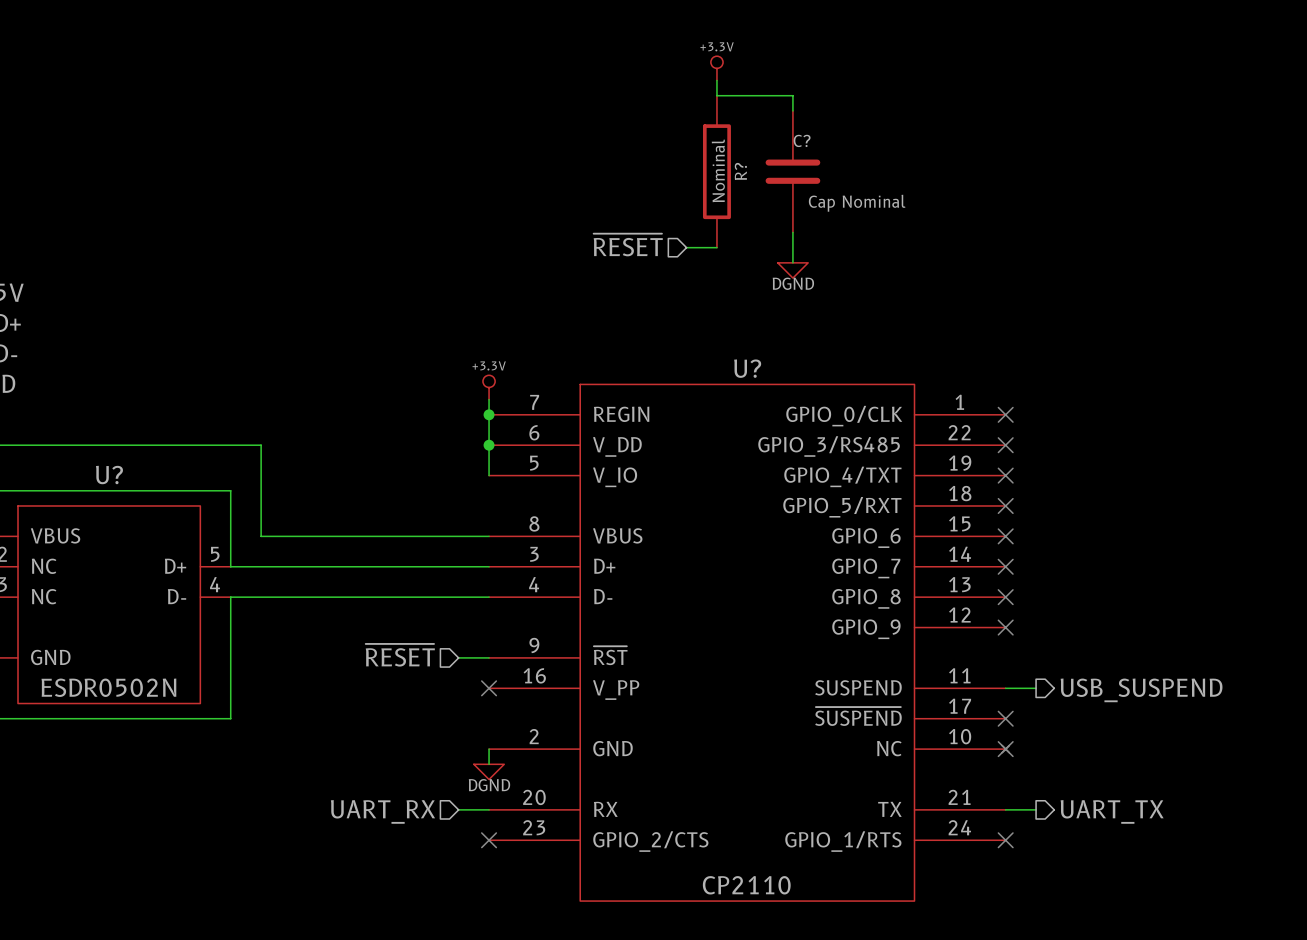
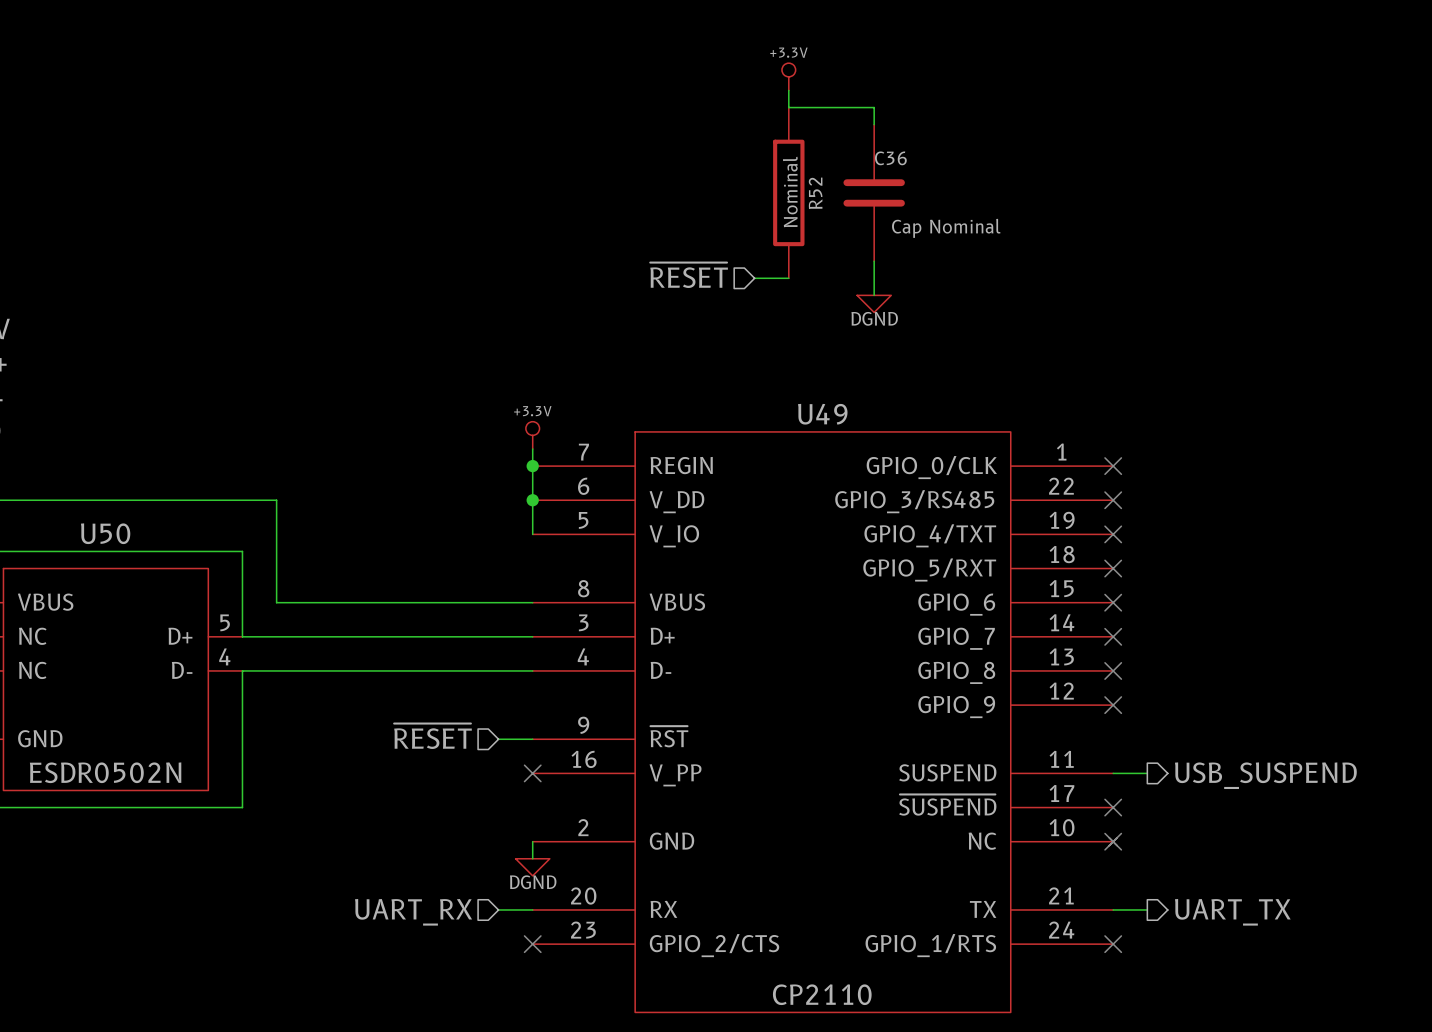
C? name: C? (802, 140) -> C36 (890, 158)
R? name: R? (740, 171) -> R52 (815, 193)
U? name: U? (747, 368) -> U49 (822, 414)
U? name: U? (109, 475) -> U50 (105, 533)

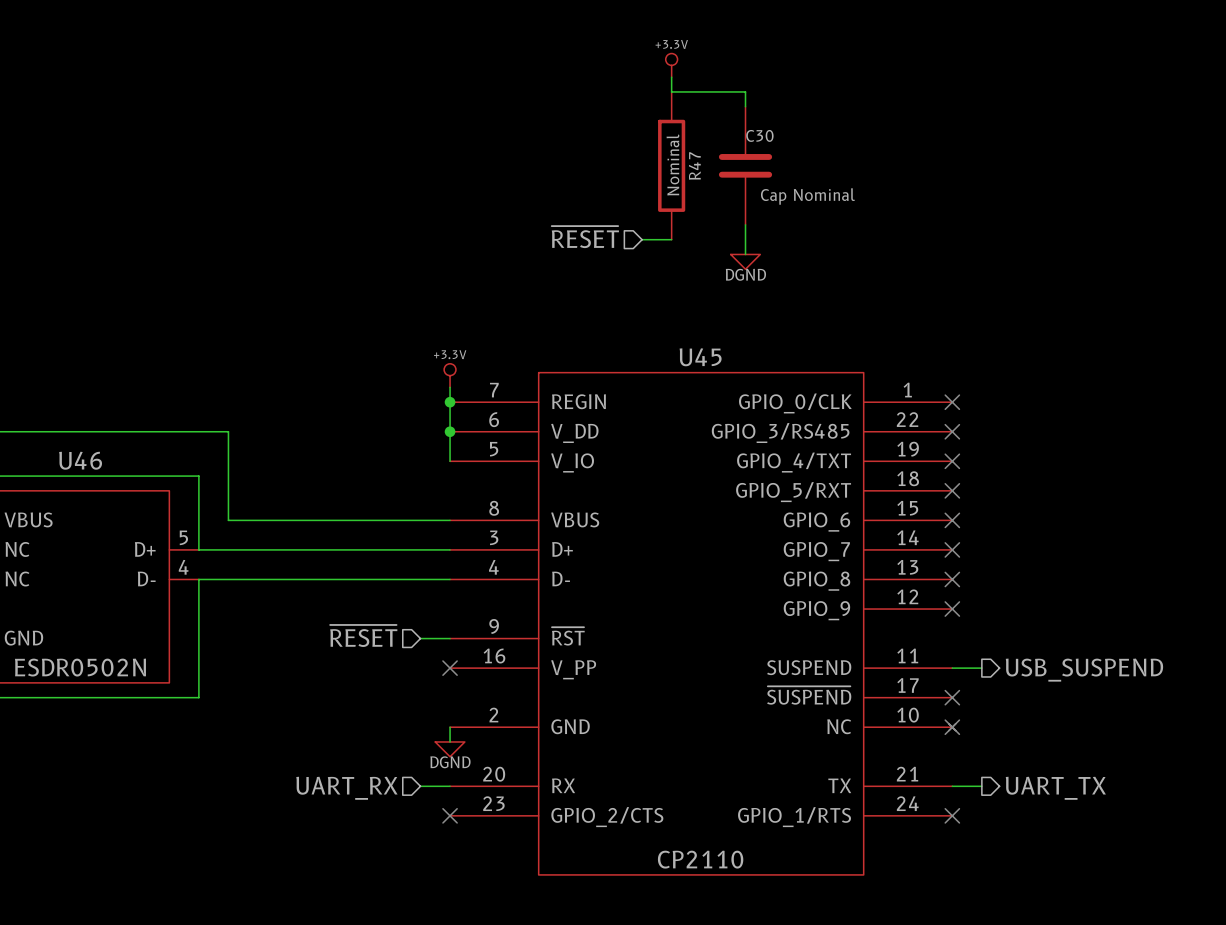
C36 name: C36 (890, 158) -> C30 (759, 135)
R52 name: R52 (815, 193) -> R47 (694, 166)
U49 name: U49 (822, 414) -> U45 (700, 357)
U50 name: U50 (105, 533) -> U46 (80, 460)

